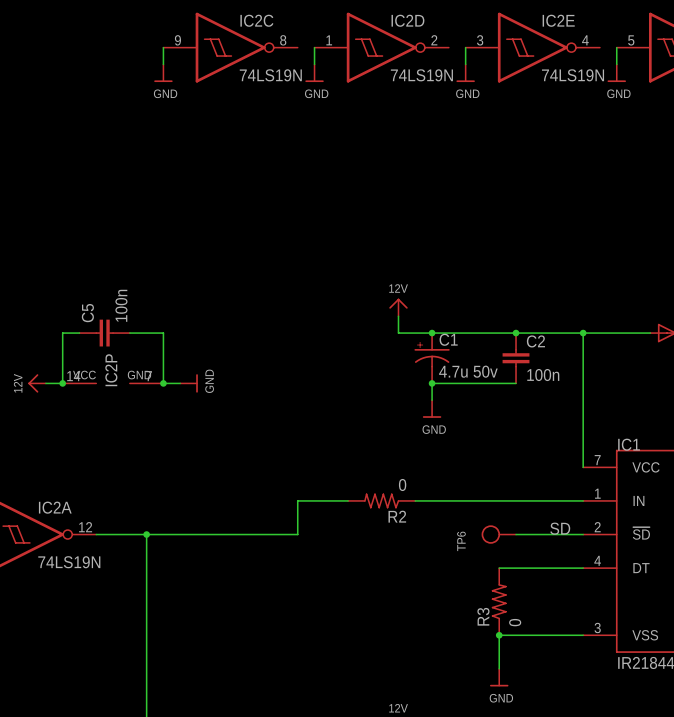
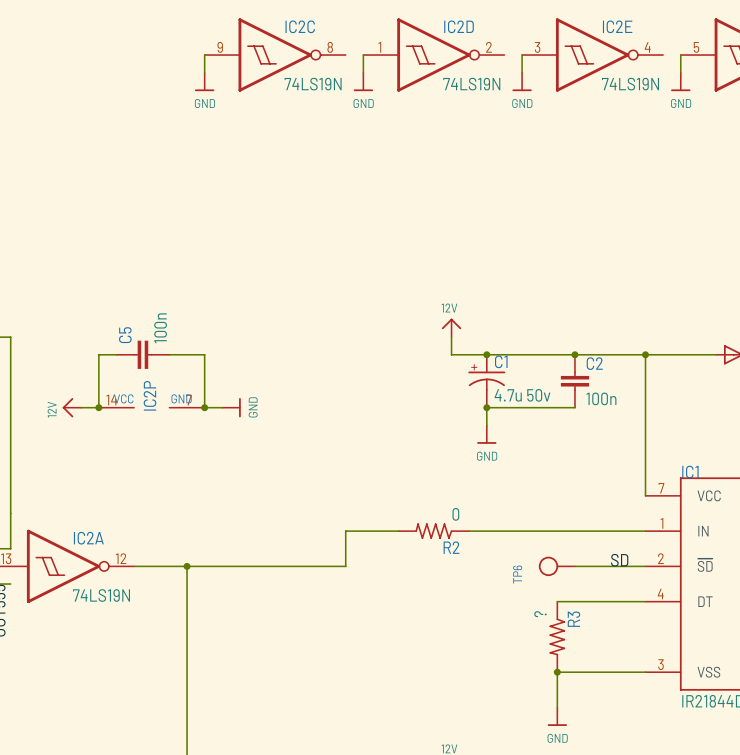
R3 rotation: 0° (499, 601) -> 180° (557, 636)
R3 value: 0 (515, 622) -> ? (540, 614)

